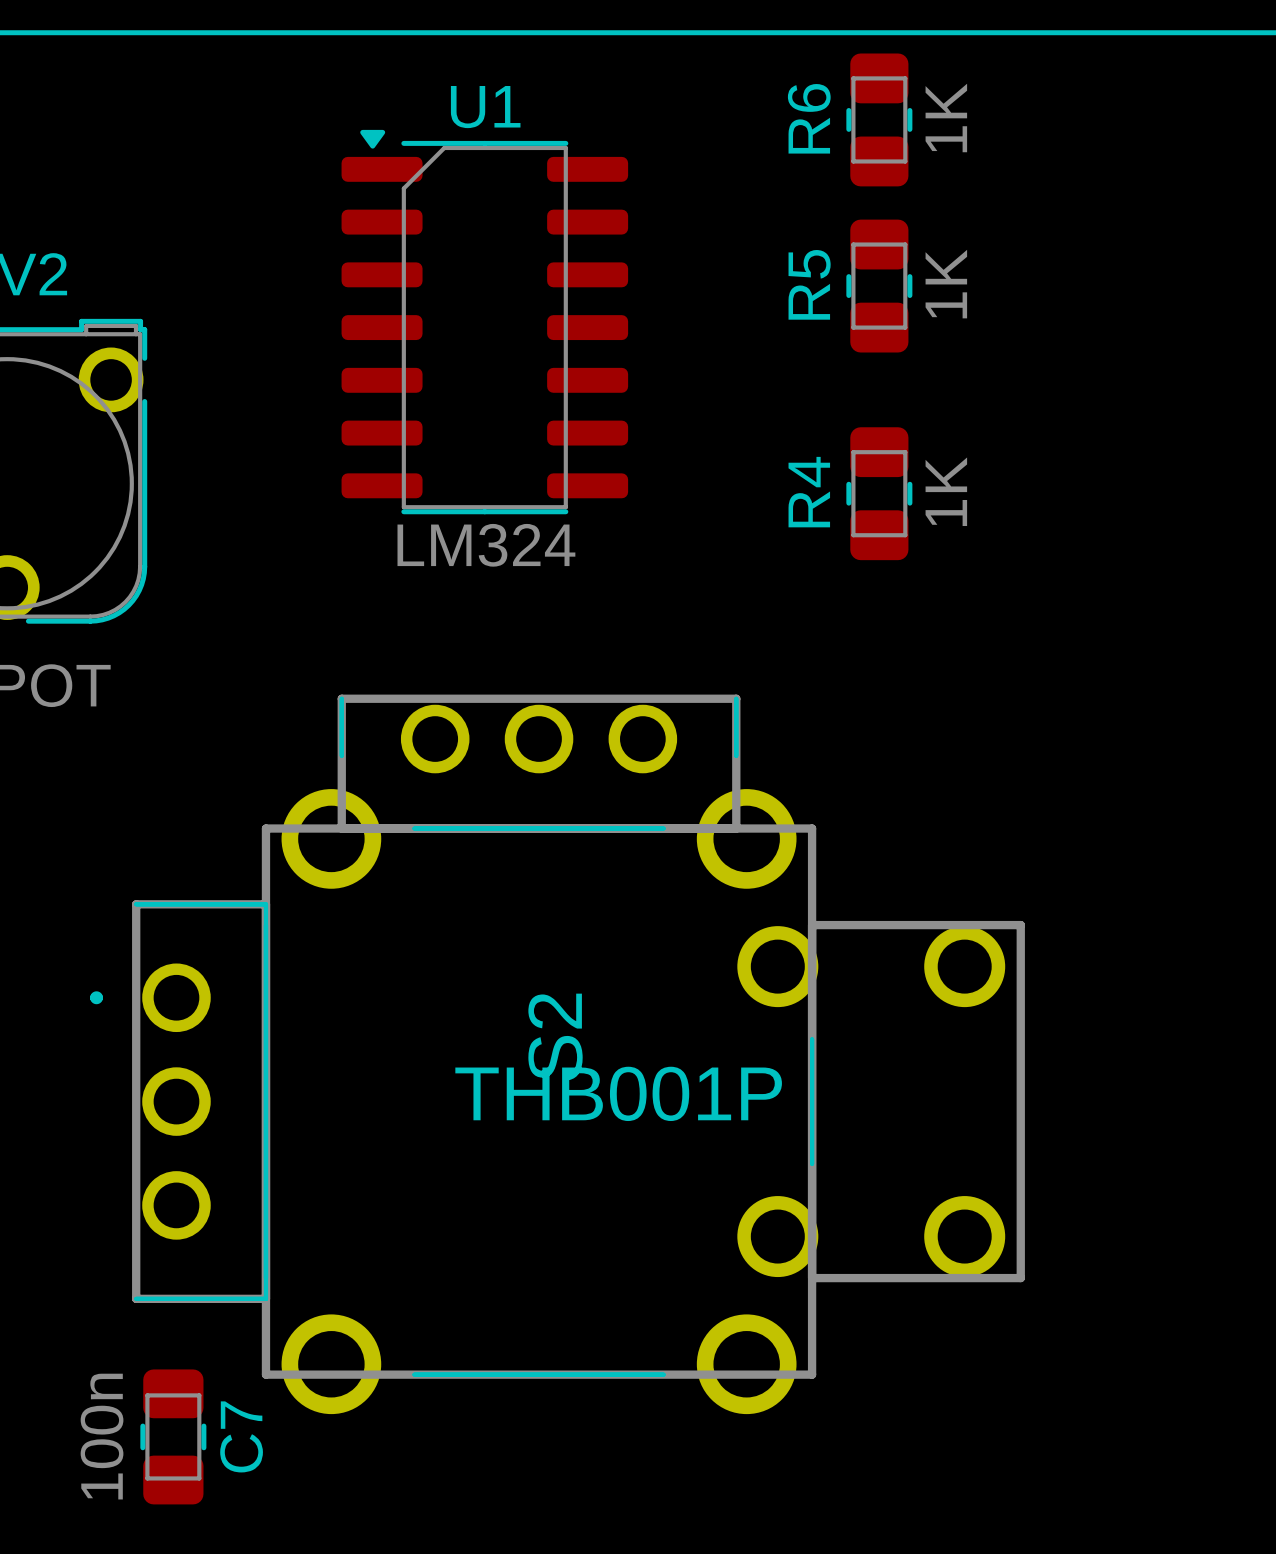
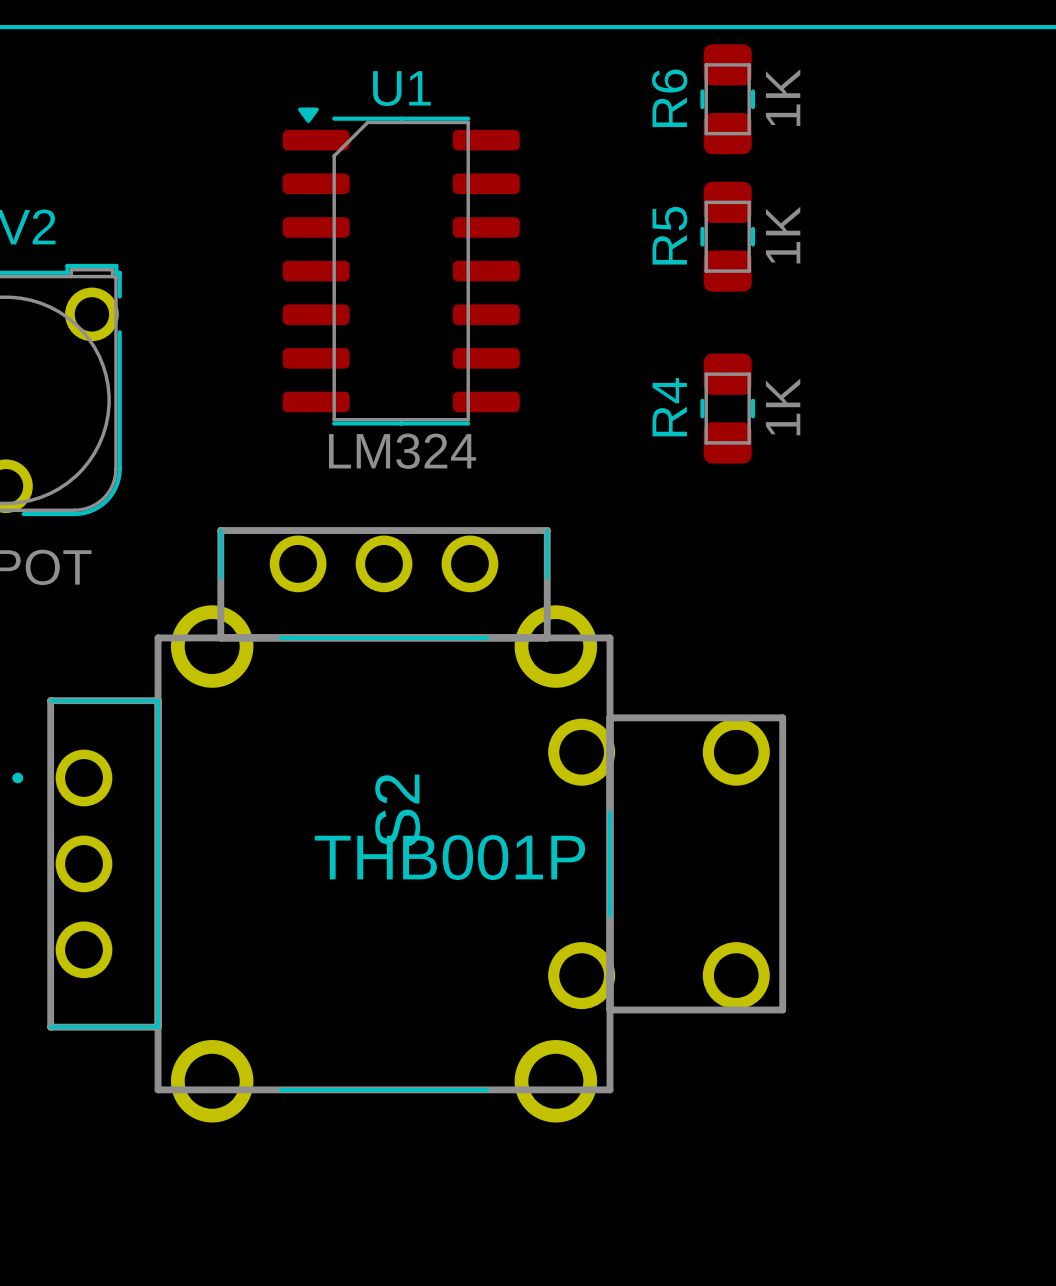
S2 position: (557, 1054) -> (399, 824)
C7: 100n (173, 1436) -> none

